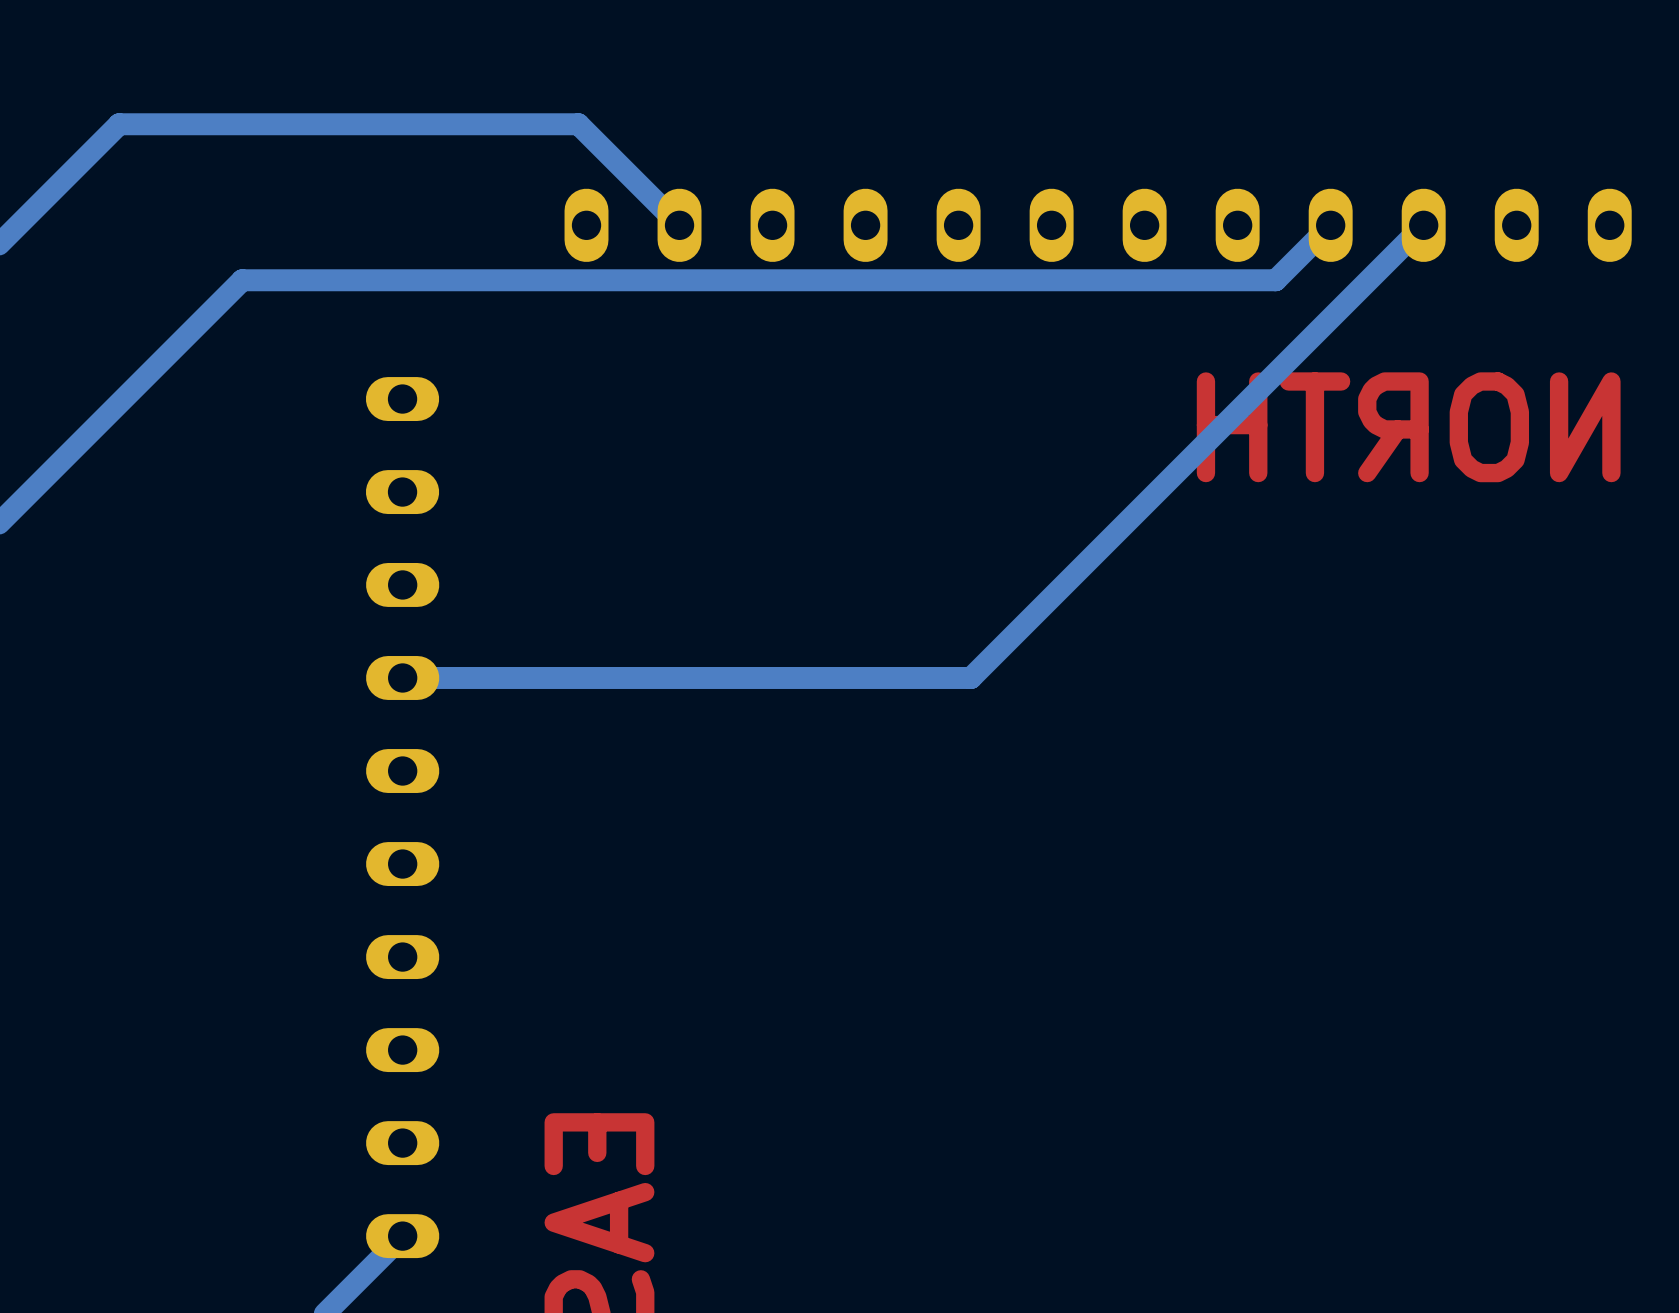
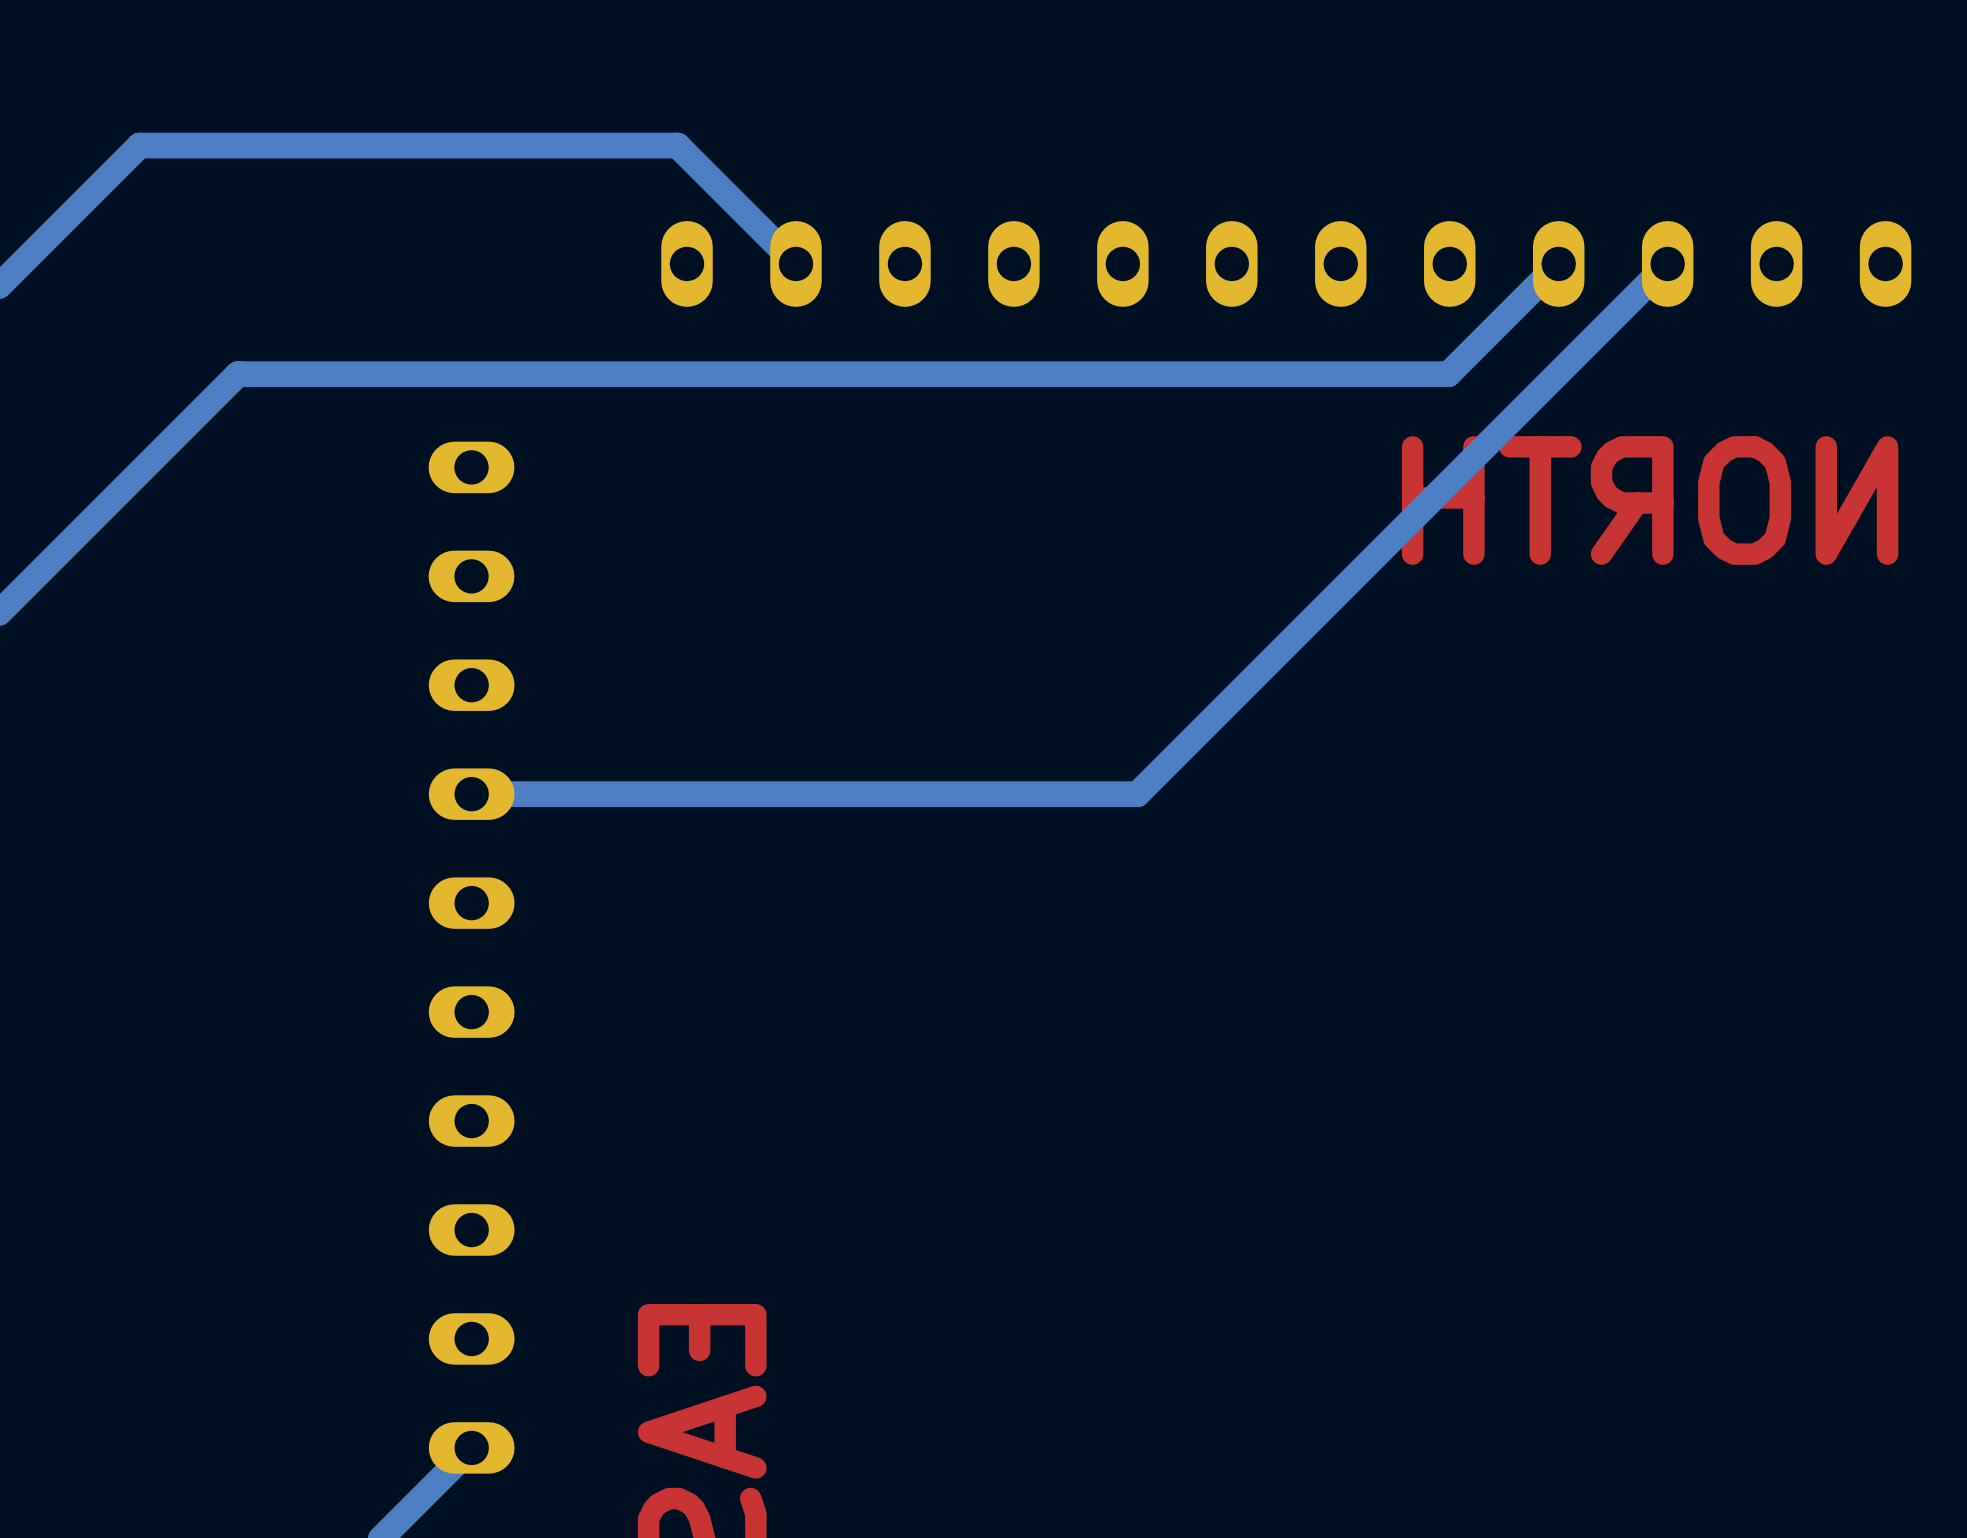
bottom track: (1275, 280) (242, 280) (203, 319) -> (1494, 328) (1448, 374) (237, 374)

